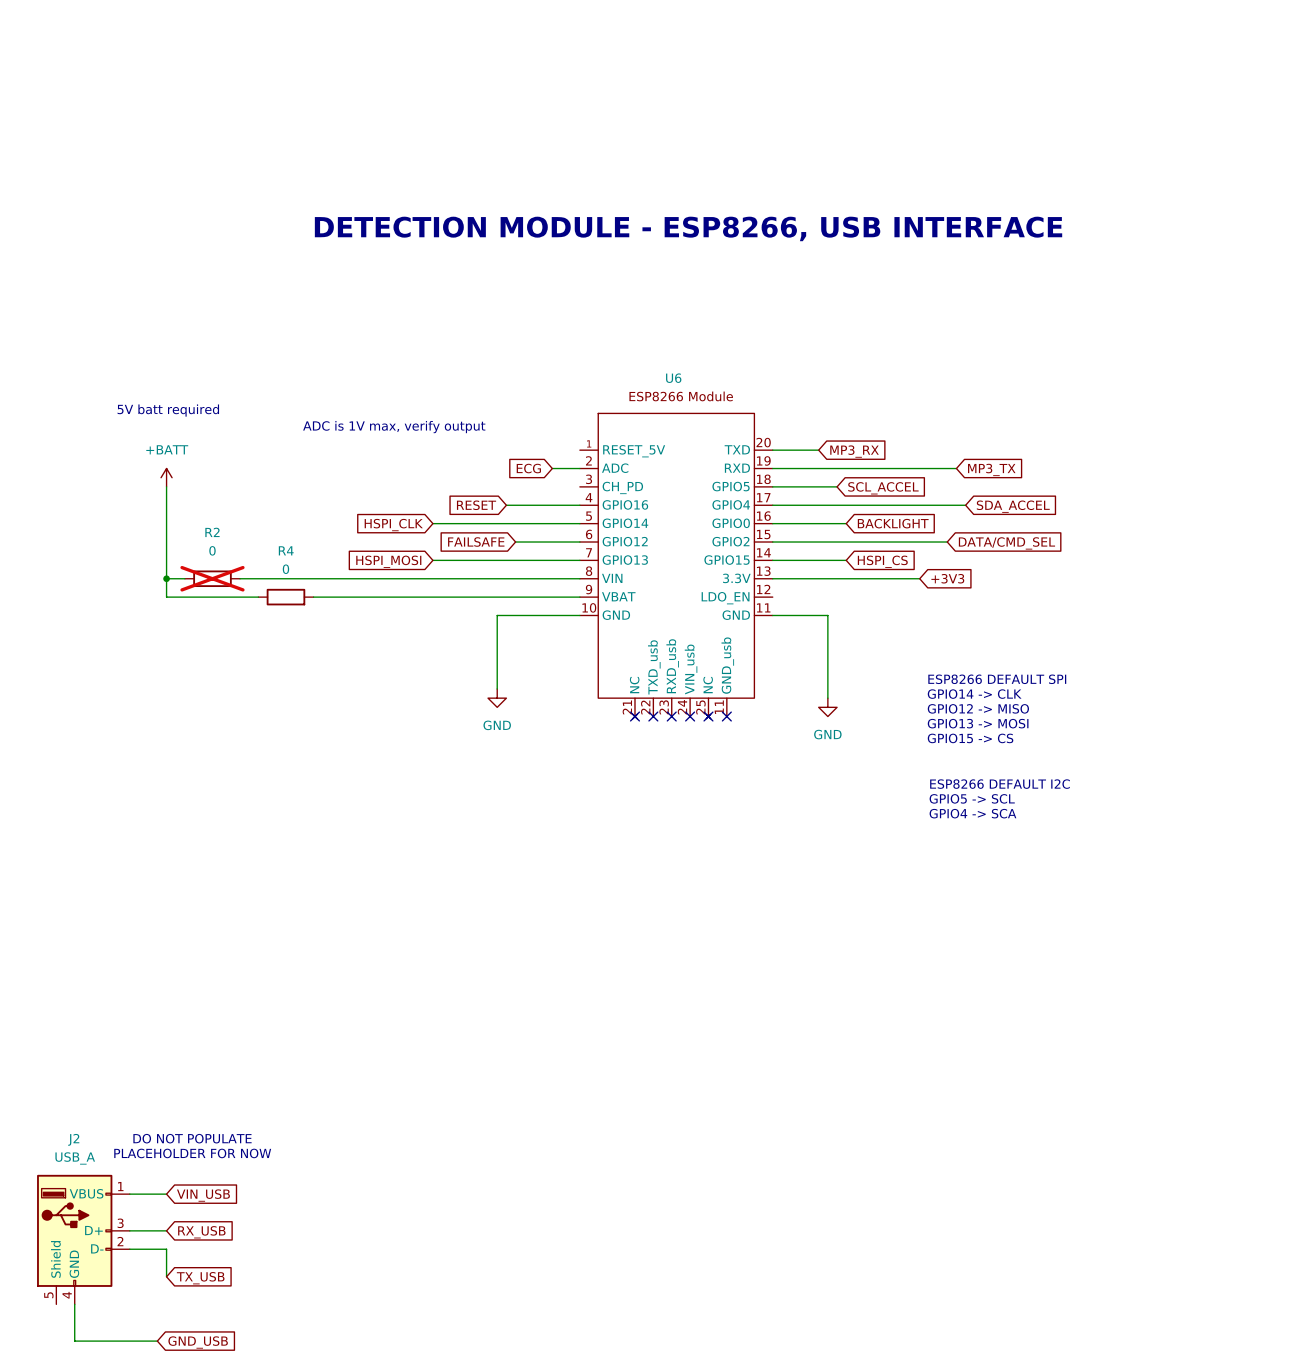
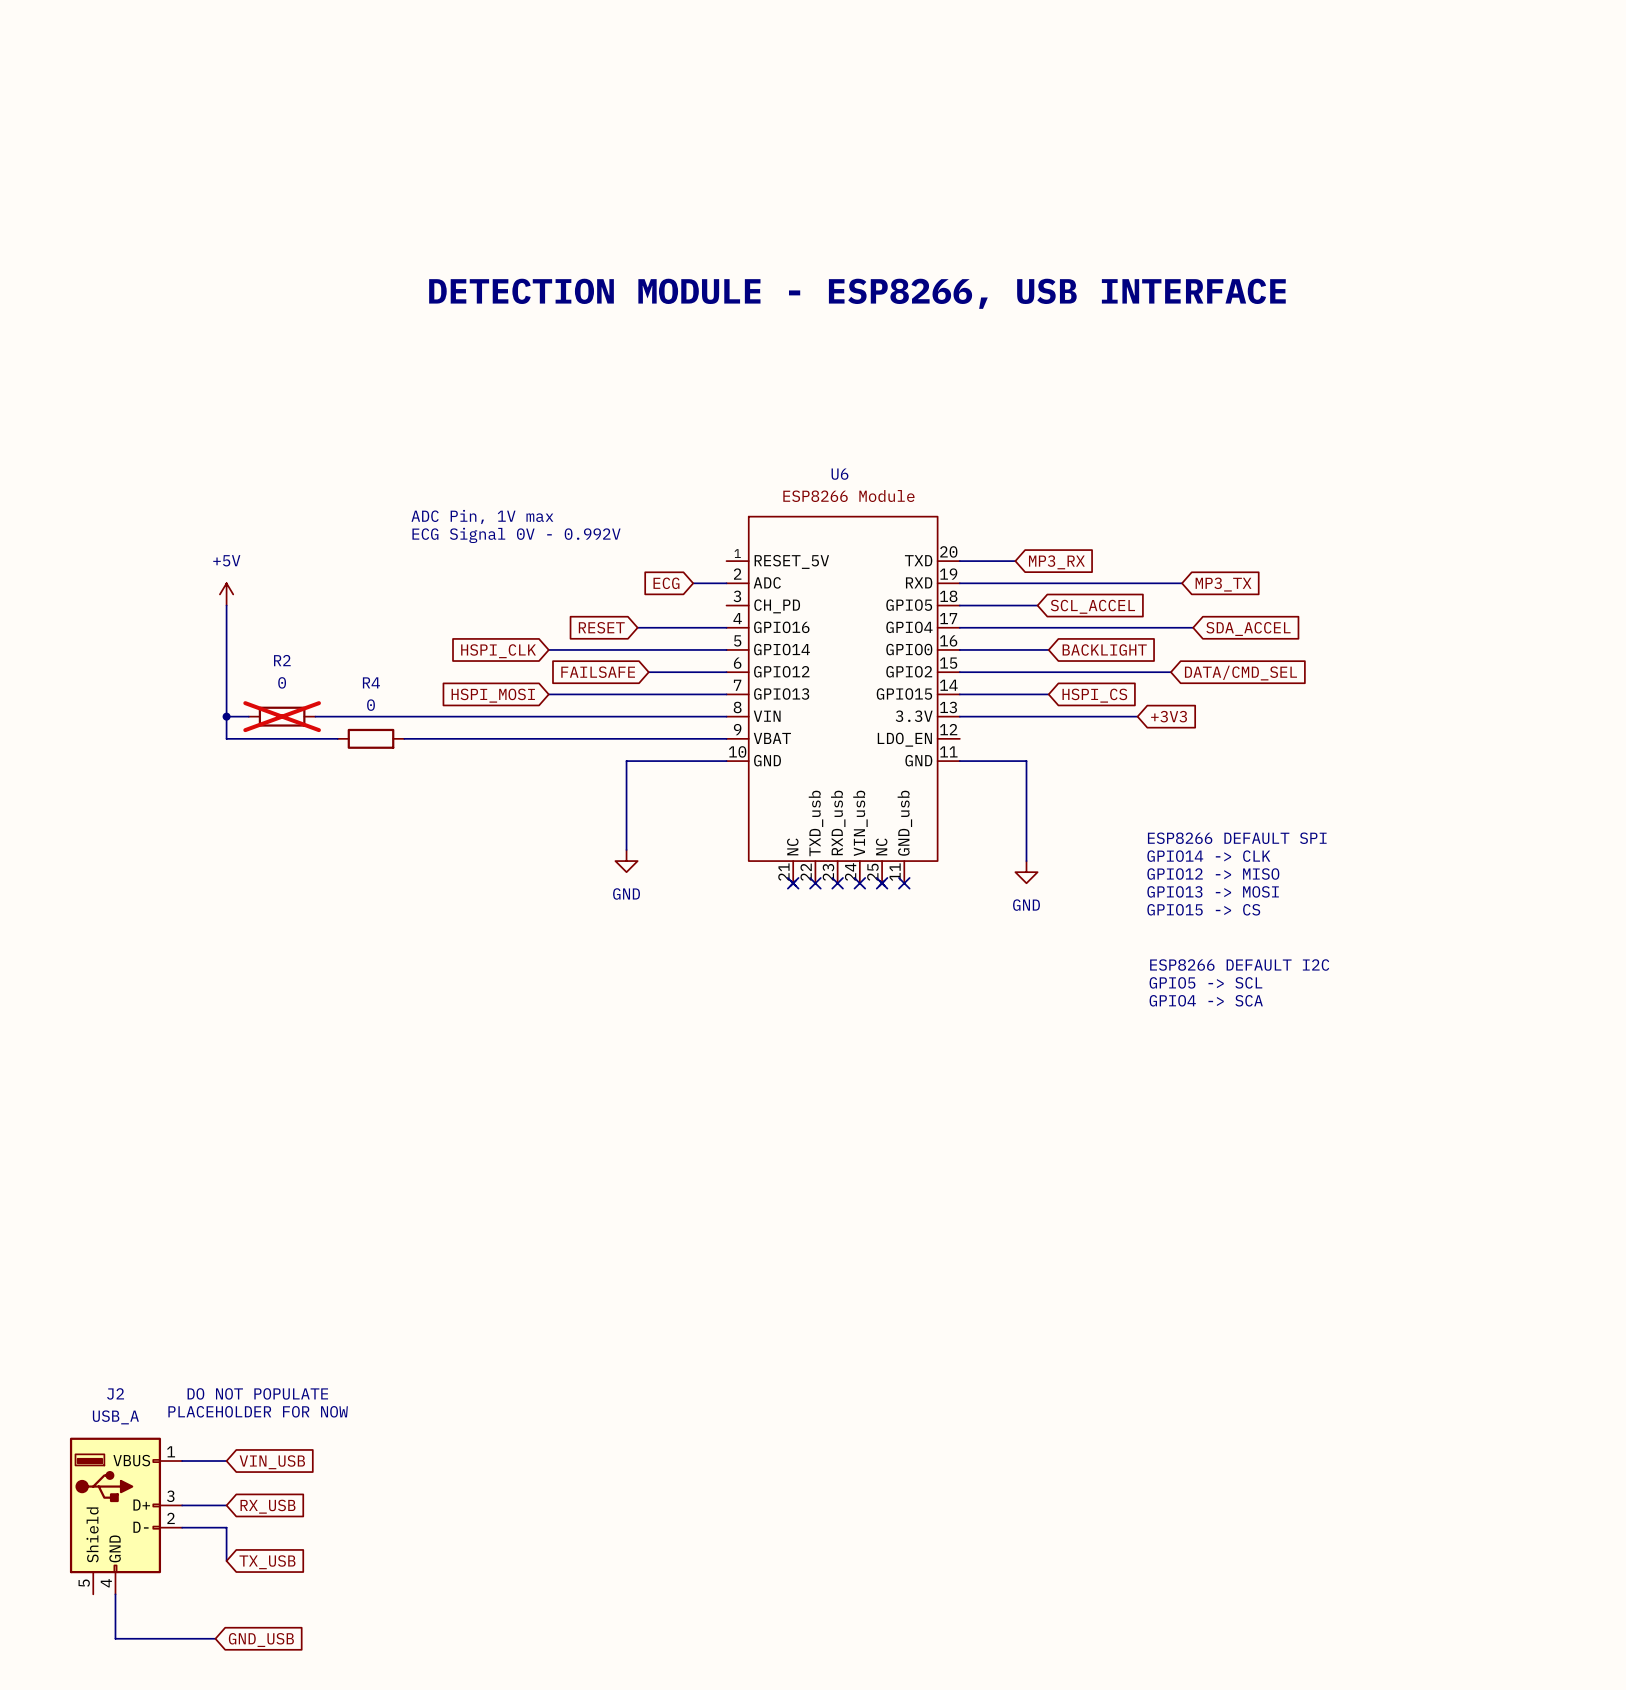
text: 5V batt required (168, 410) -> none
text: none -> ADC Pin, 1V max (482, 516)
text: ADC is 1V max, verify output (394, 427) -> none
text: none -> ECG Signal 0V - 0.992V (516, 535)
power symbol: +BATT (166, 477) -> +5V (226, 594)

